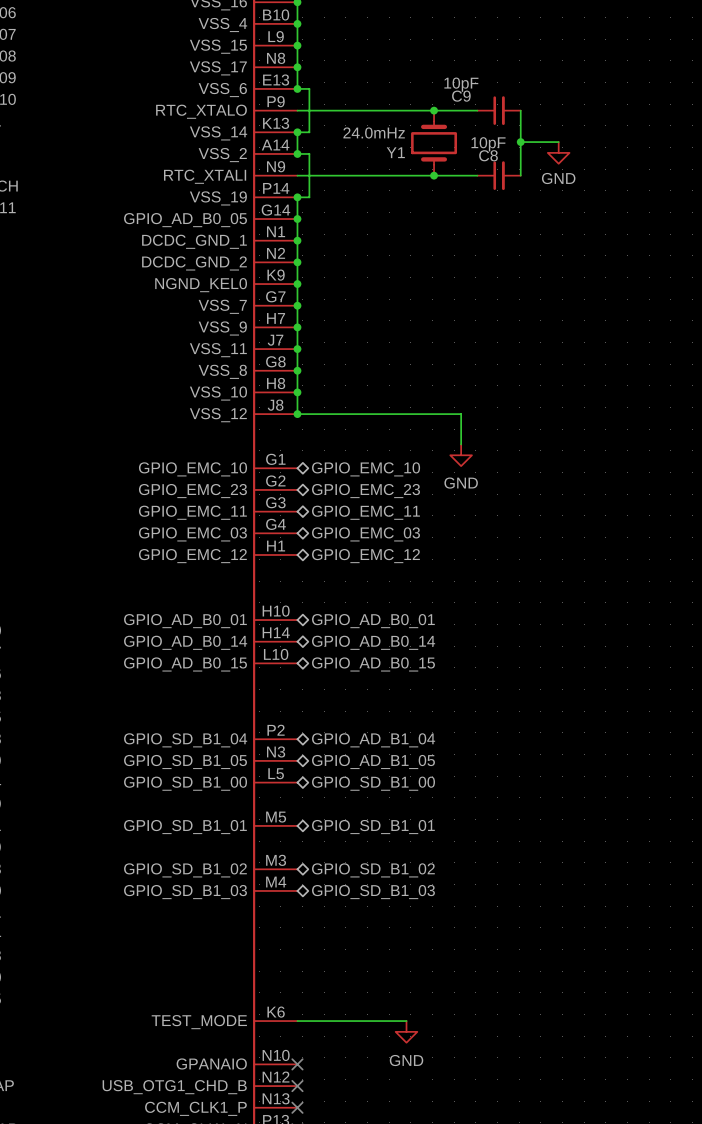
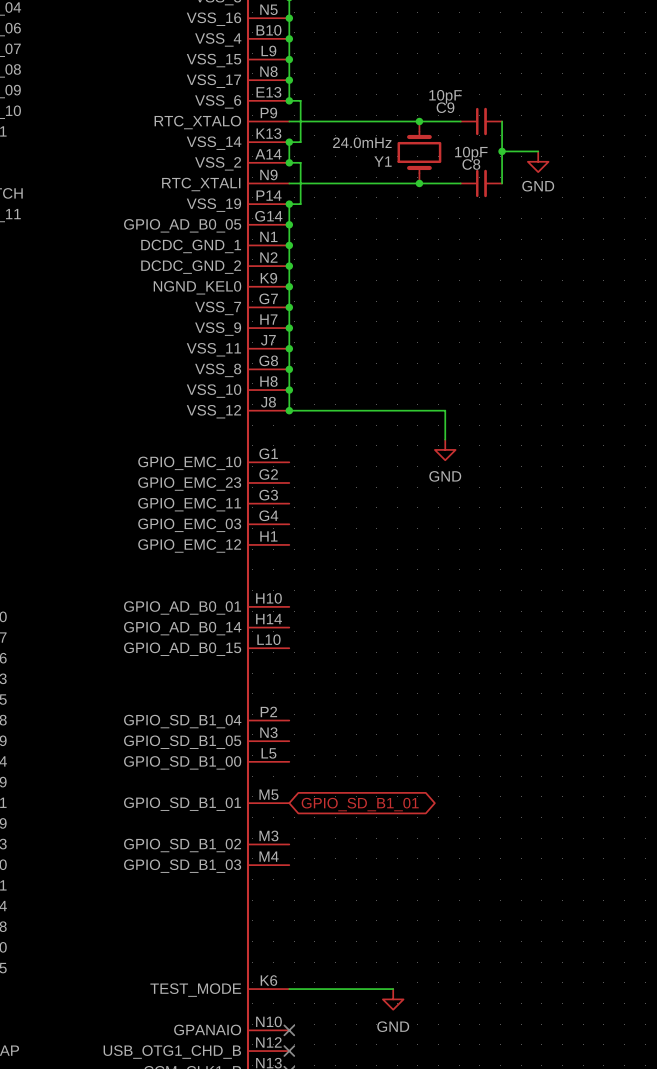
hierarchical label: GPIO_EMC_10 (366, 469) -> none
hierarchical label: GPIO_EMC_23 (366, 491) -> none
hierarchical label: GPIO_EMC_11 (365, 512) -> none
hierarchical label: GPIO_EMC_03 (366, 534) -> none
hierarchical label: GPIO_EMC_12 (365, 556) -> none
hierarchical label: GPIO_AD_B0_01 (373, 621) -> none
hierarchical label: GPIO_AD_B0_14 (373, 642) -> none
hierarchical label: GPIO_AD_B0_15 (373, 664) -> none
hierarchical label: GPIO_AD_B1_04 (373, 740) -> none
hierarchical label: GPIO_AD_B1_05 (373, 762) -> none
hierarchical label: GPIO_SD_B1_00 (373, 783) -> none
global label: none -> GPIO_SD_B1_01 (360, 804)
hierarchical label: GPIO_SD_B1_01 (373, 827) -> none
hierarchical label: GPIO_SD_B1_02 (373, 870) -> none
hierarchical label: GPIO_SD_B1_03 (373, 892) -> none

